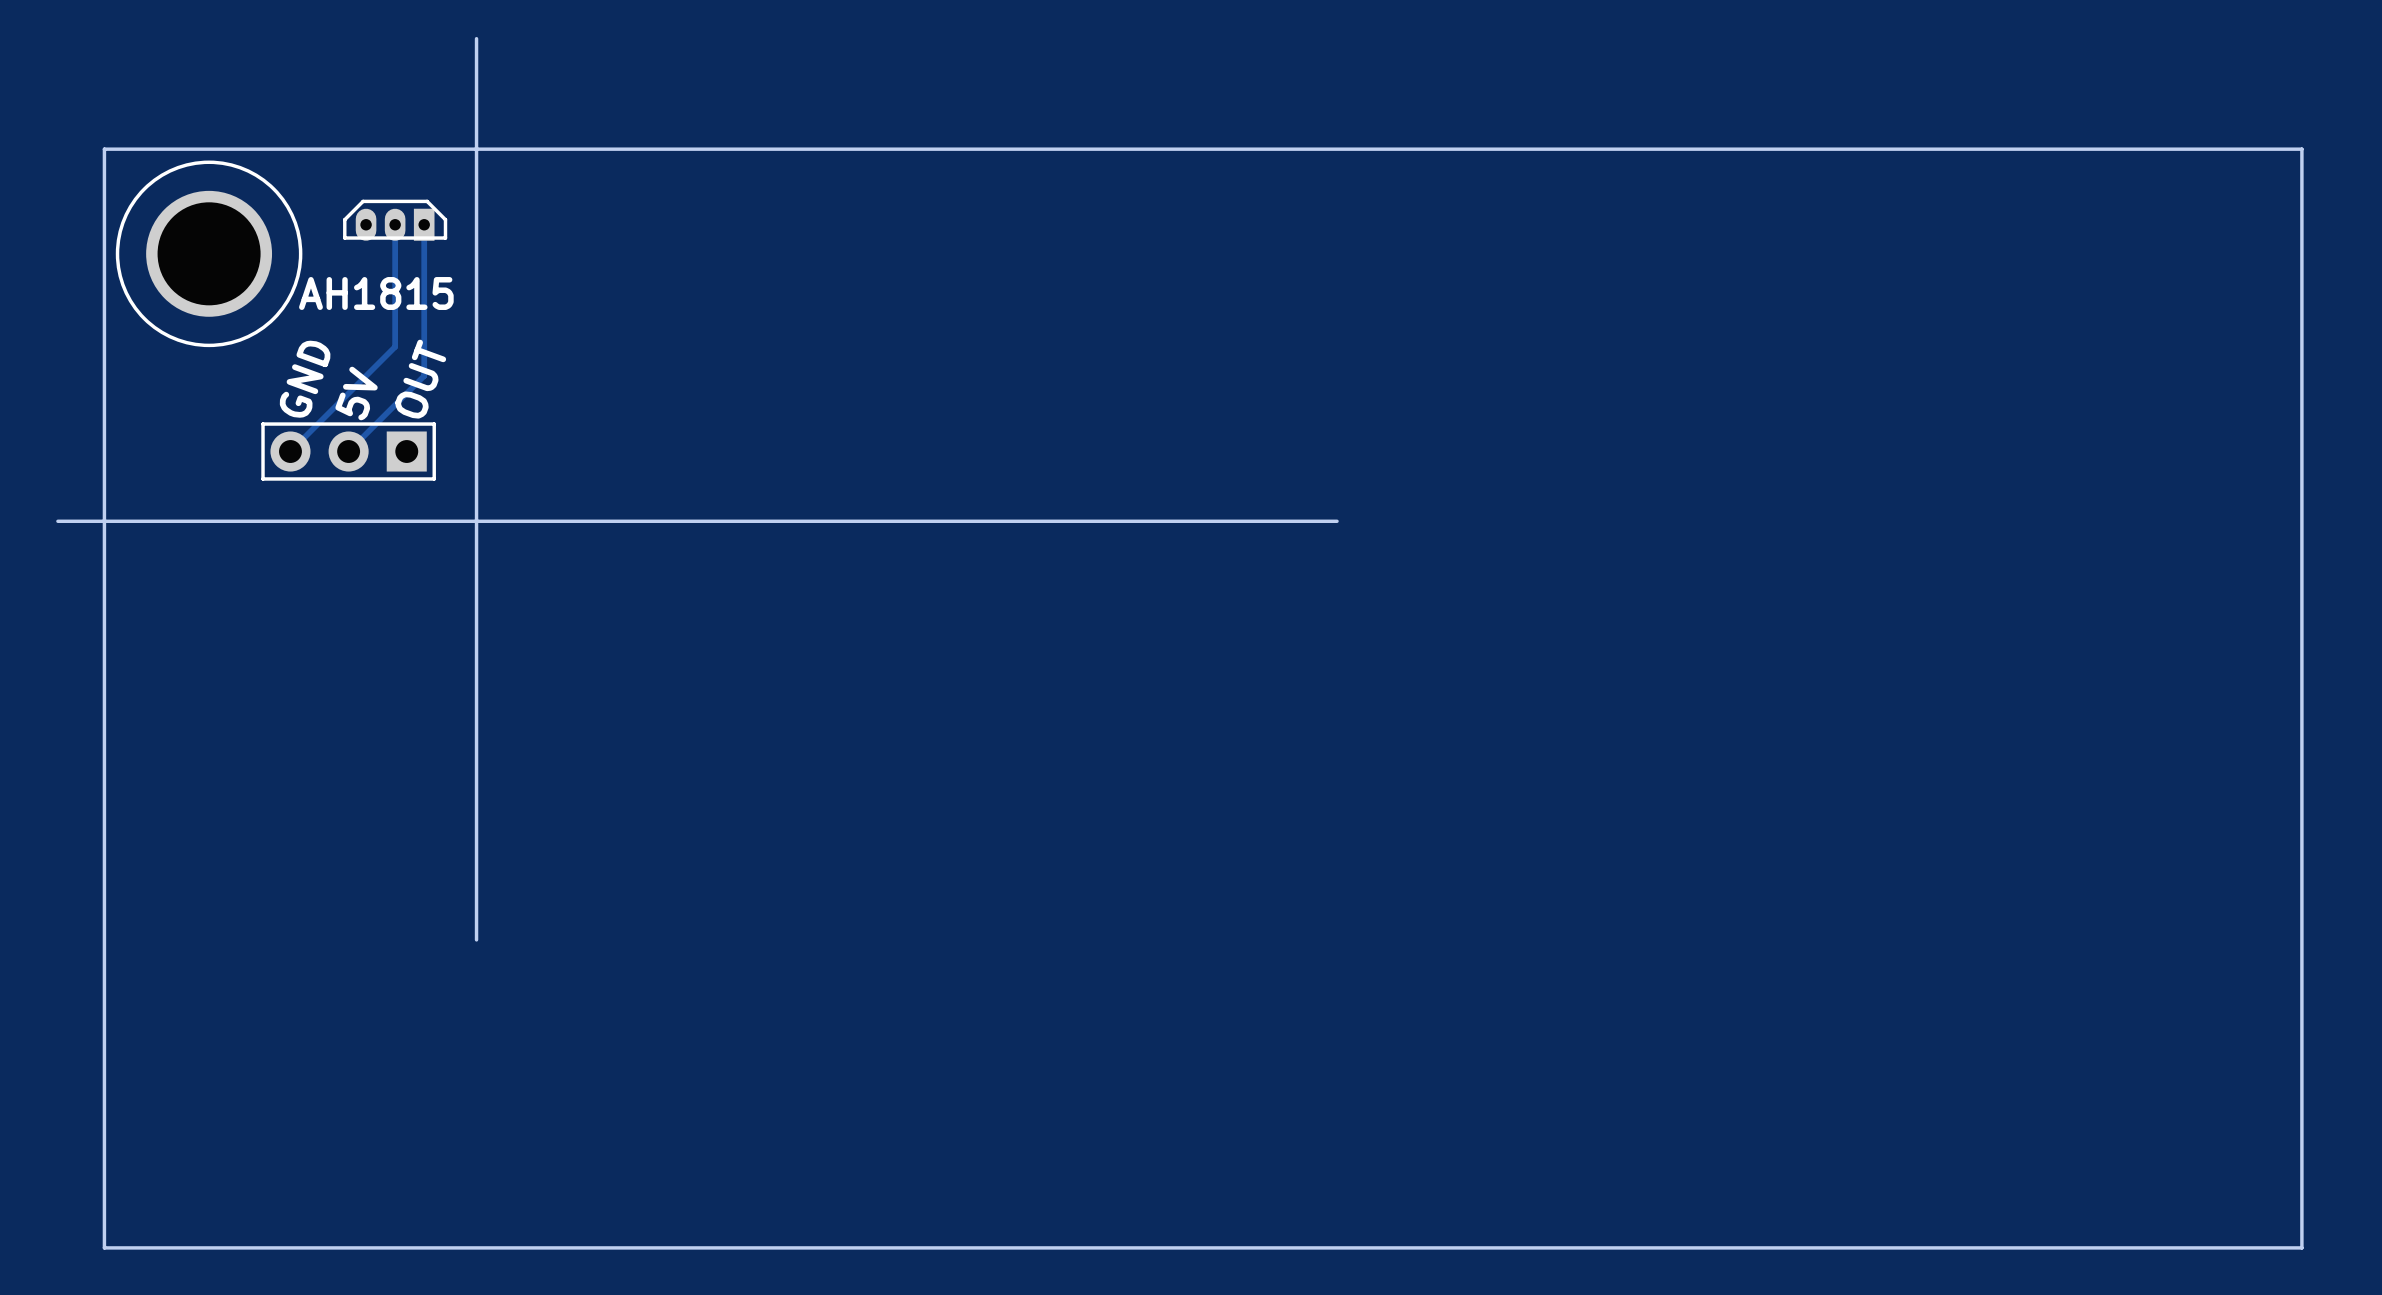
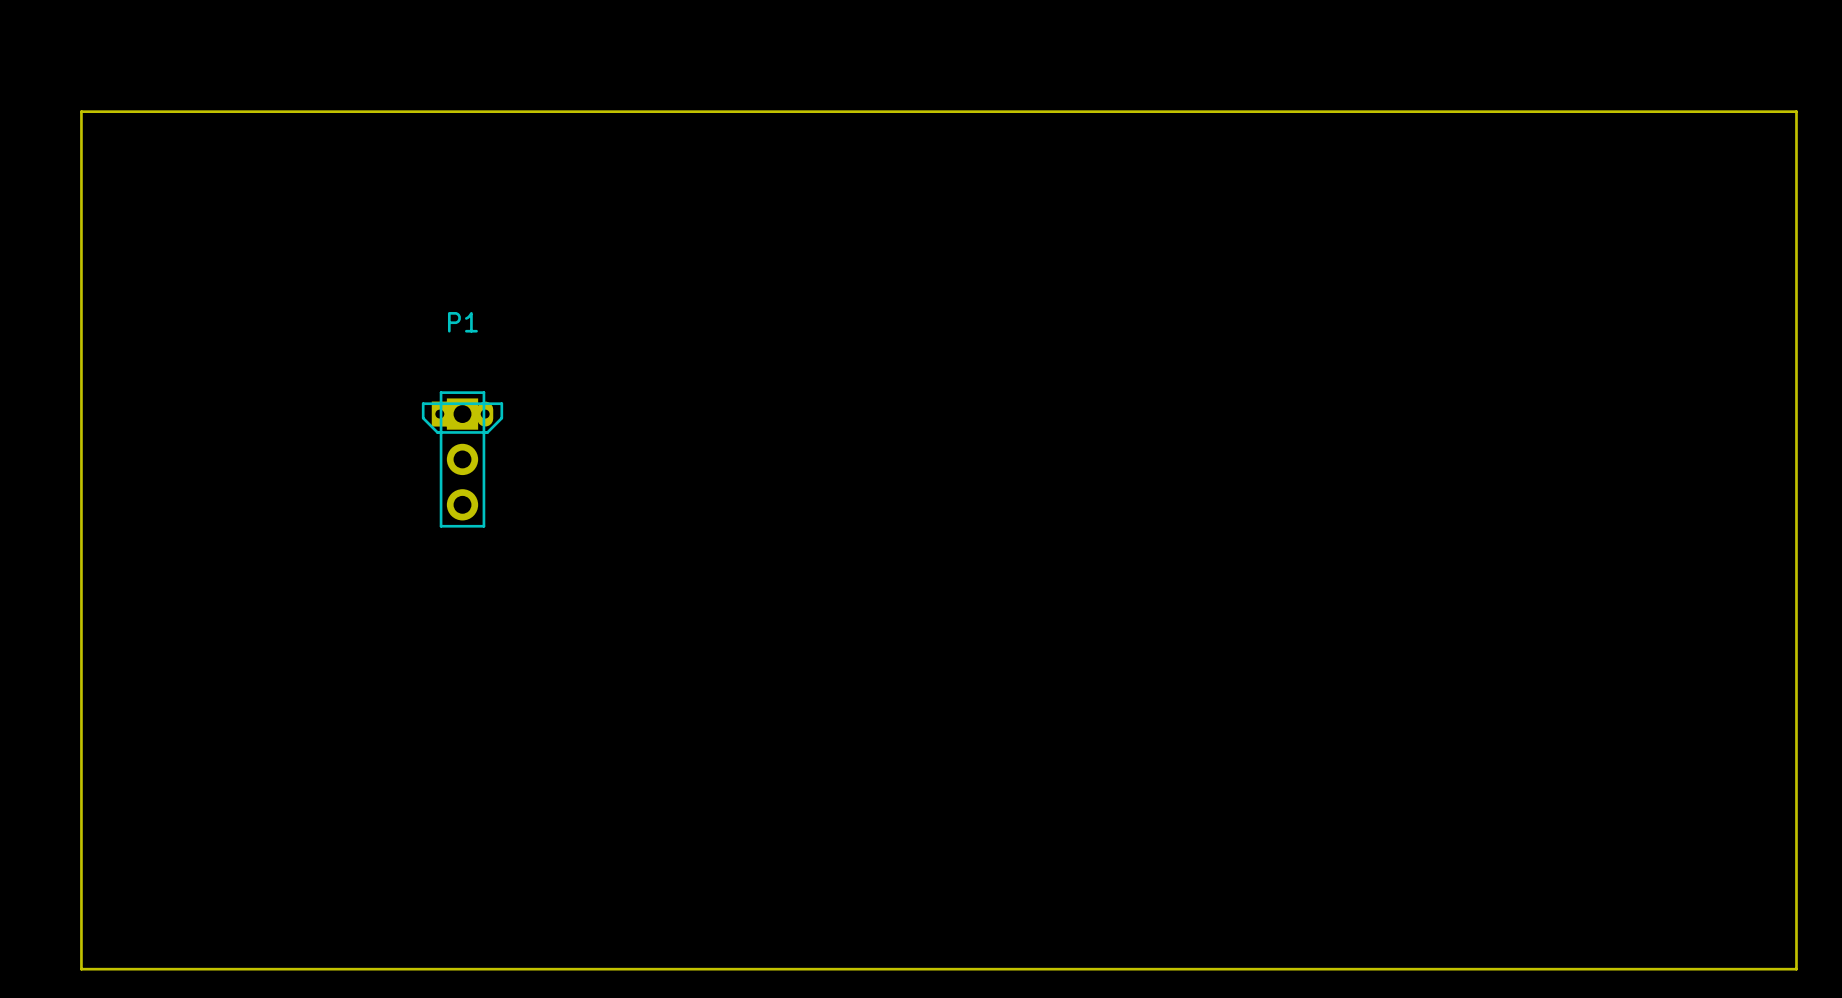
board edge: (476, 38) (476, 939) -> none
part side: bottom (395, 220) -> top (462, 417)
track: (395, 224) (395, 346) (290, 451) -> none
track: (424, 224) (424, 375) (348, 451) -> none
part: (209, 253) -> none
text: AH1815 (376, 293) -> none
text: GND (305, 379) -> none
text: OUT (420, 379) -> none
text: 5V (356, 393) -> none
part: (348, 451) -> none
board edge: (57, 521) (1337, 521) -> none
P1: none -> (462, 459)

